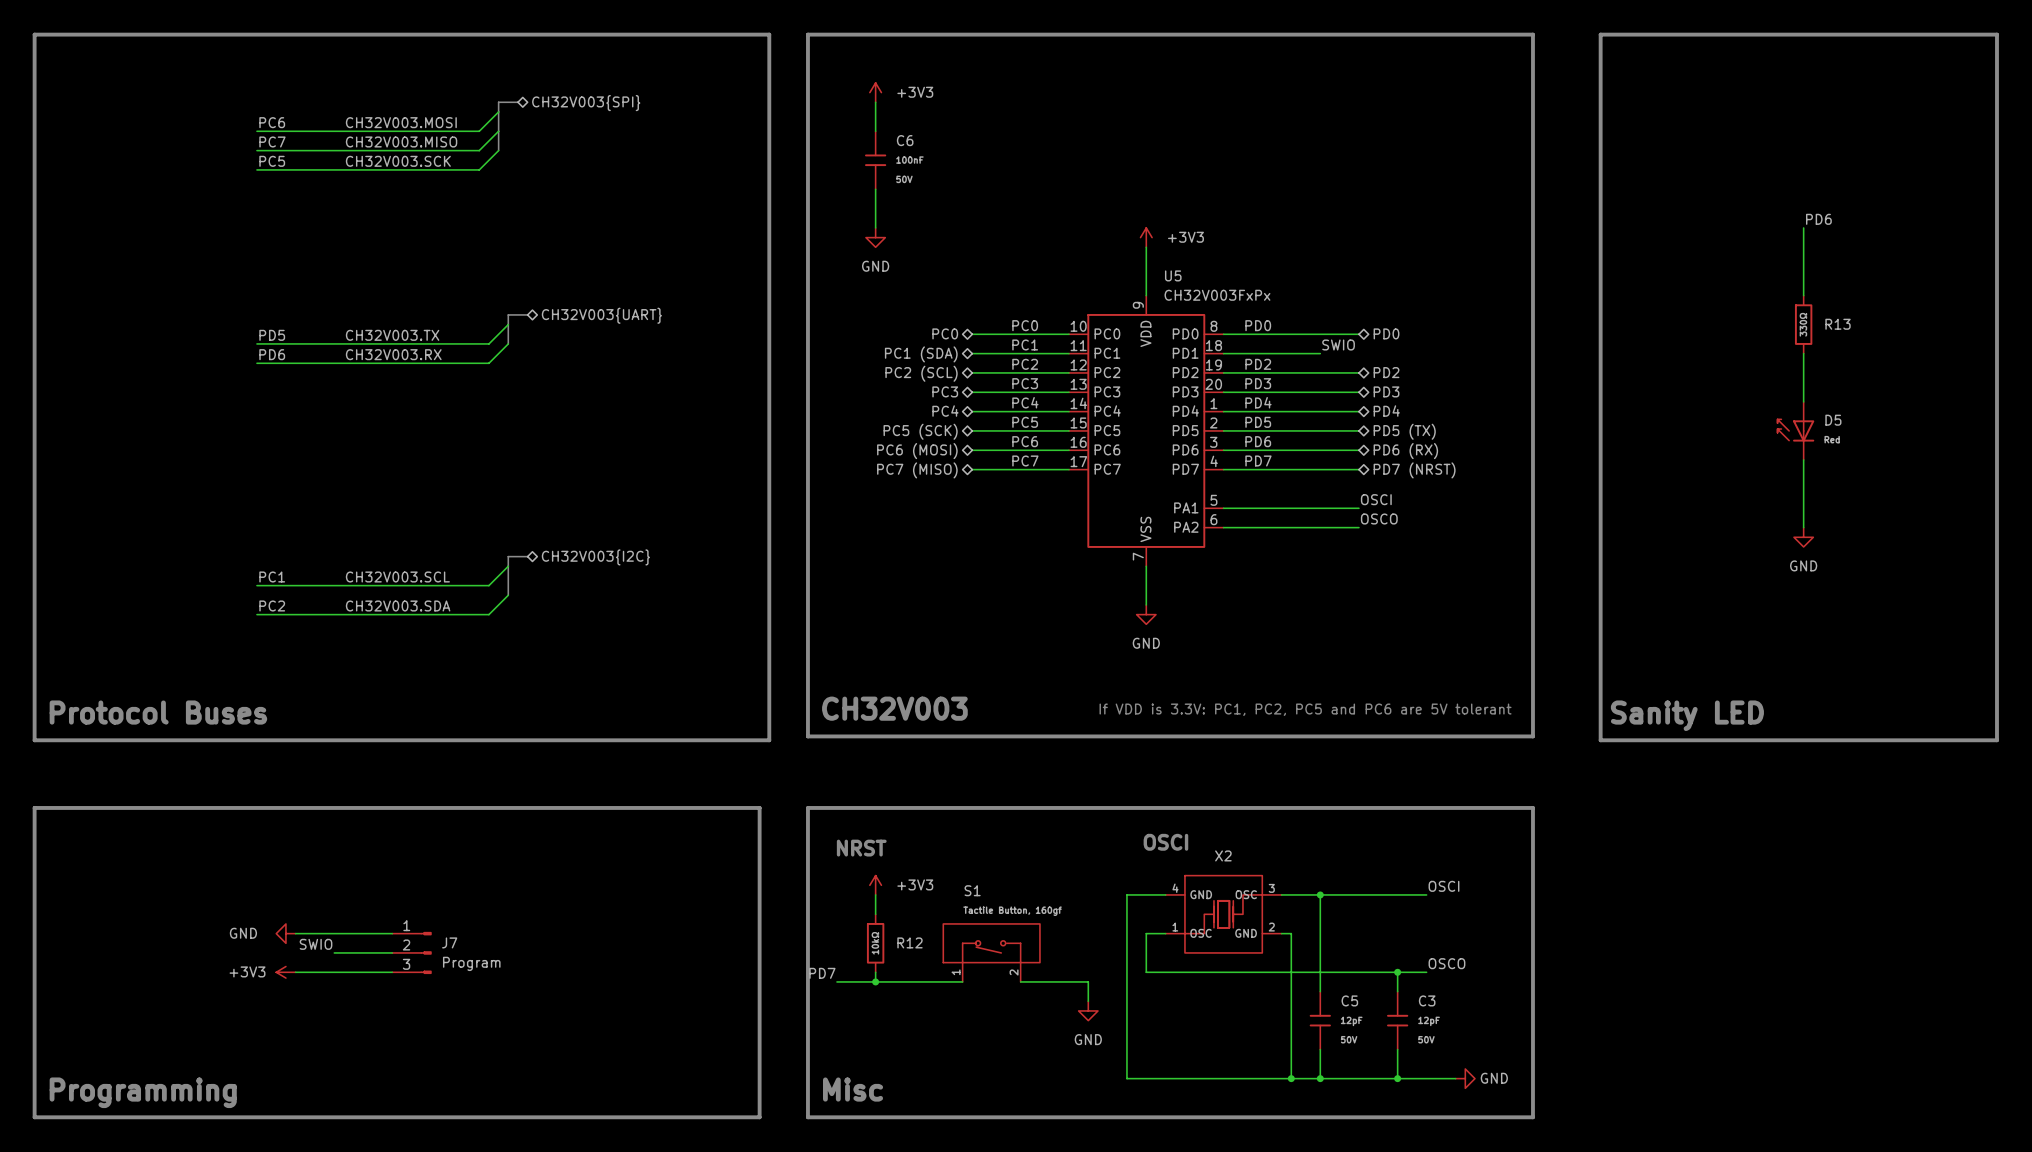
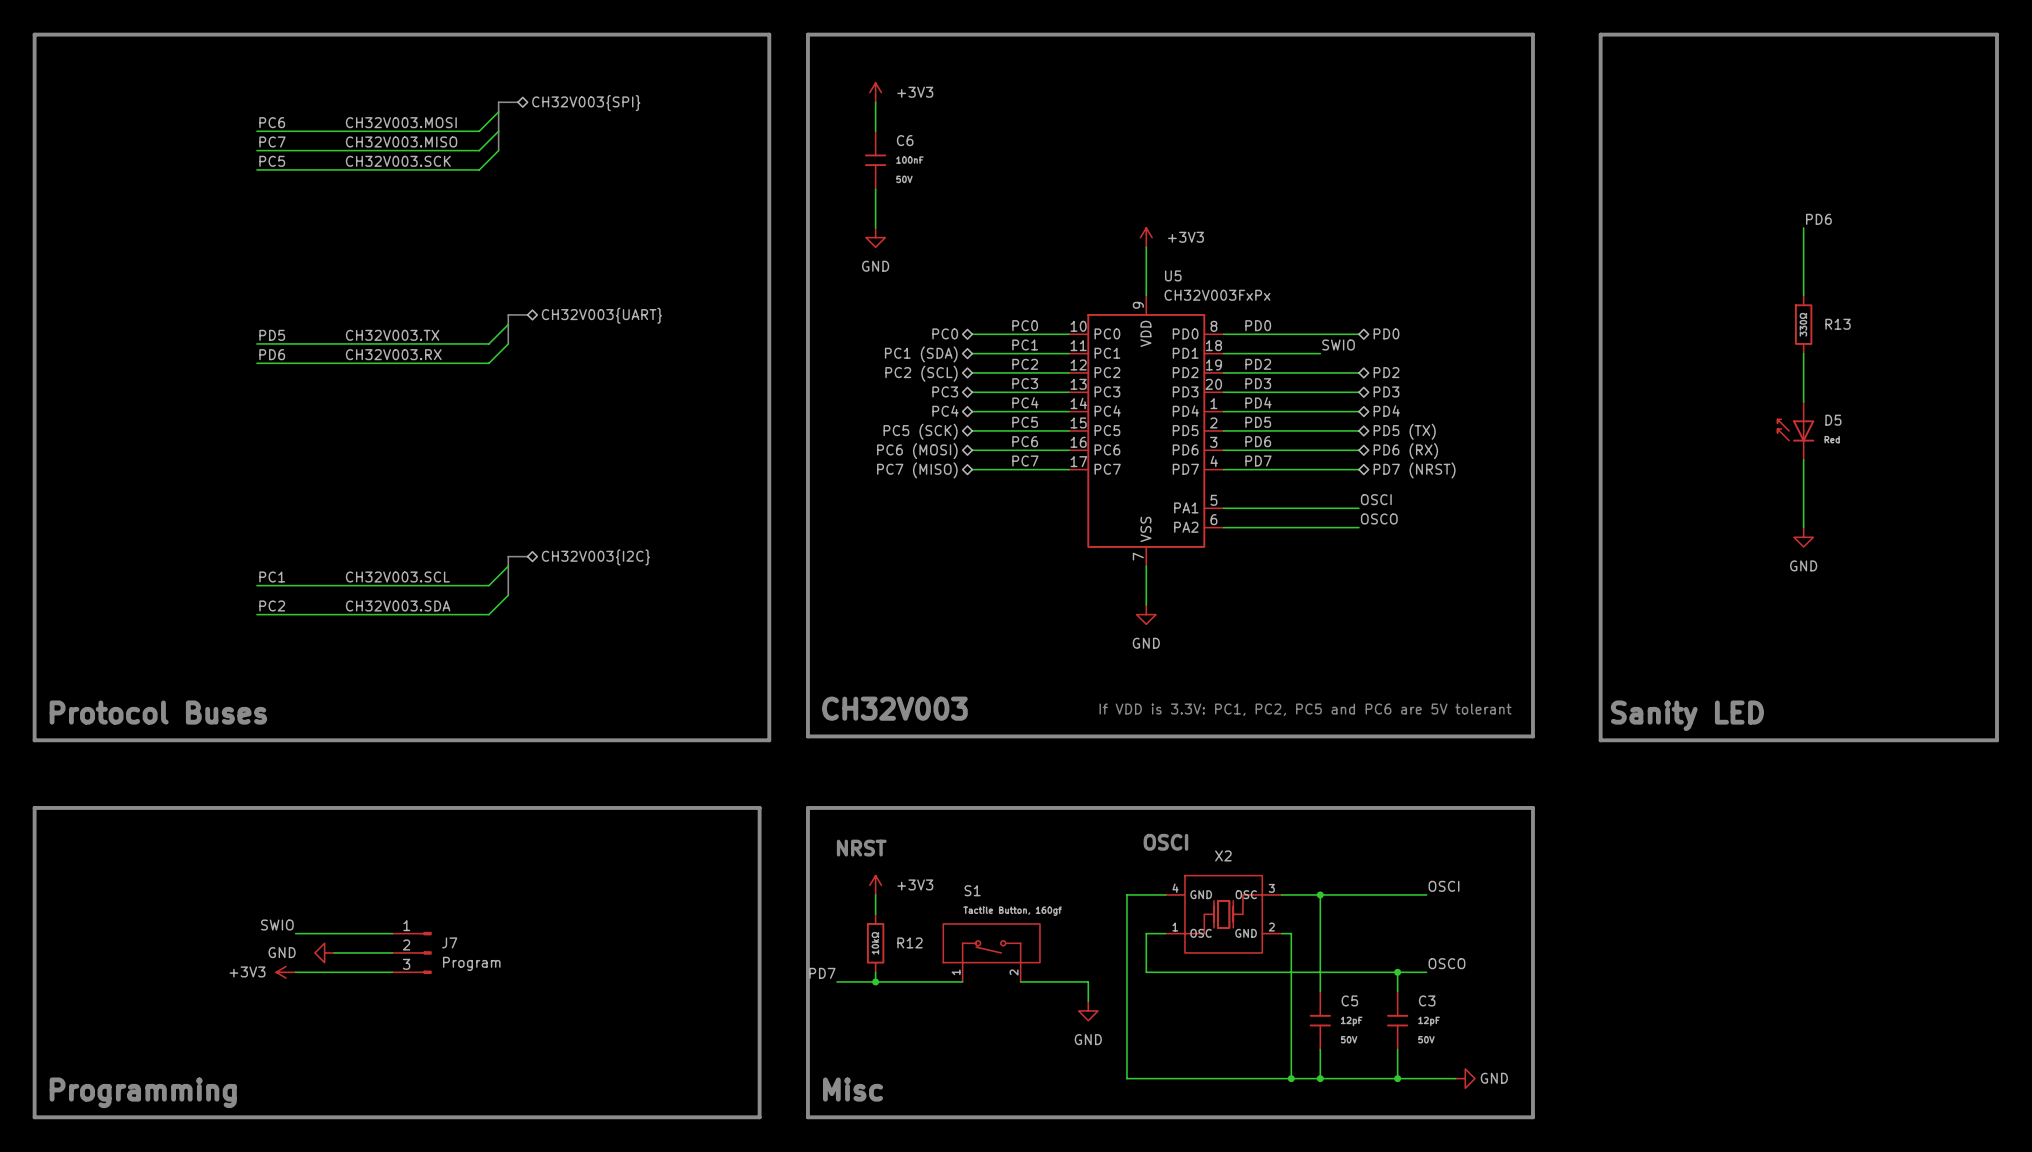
power symbol position: GND (285, 933) -> GND (324, 952)
label position: SWIO (316, 944) -> SWIO (277, 925)

